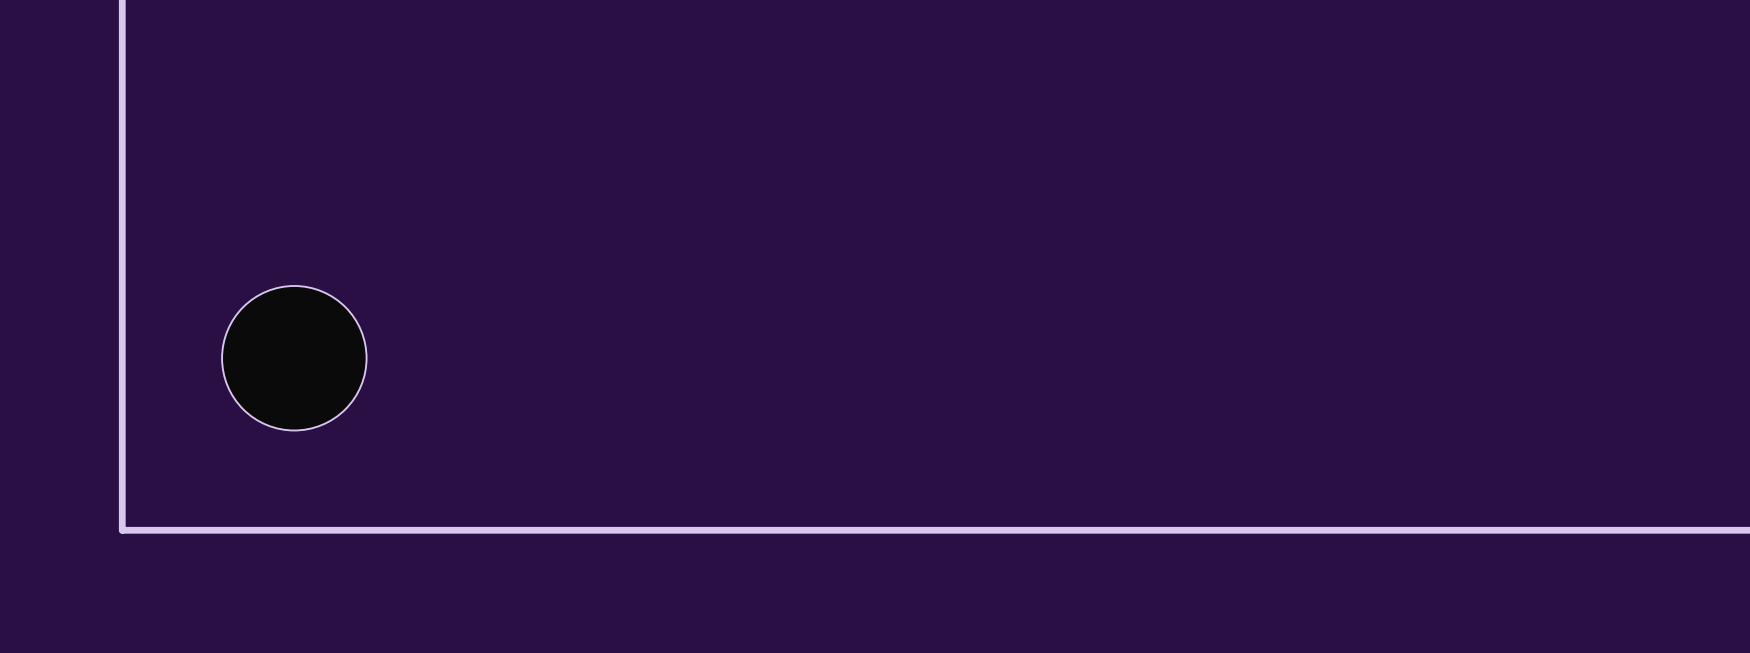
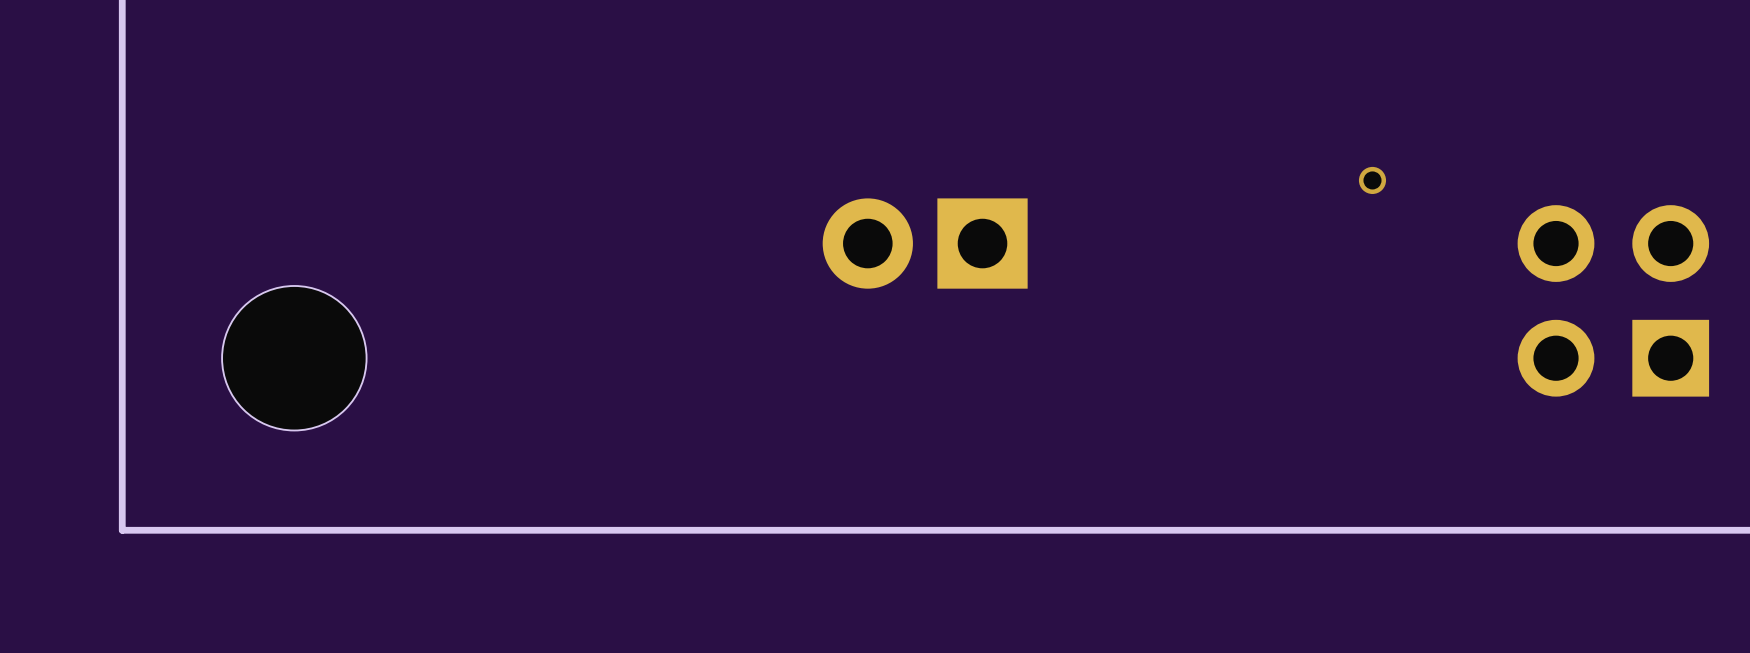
via: none -> (1372, 180)
part: none -> (925, 243)
part: none -> (1613, 300)

